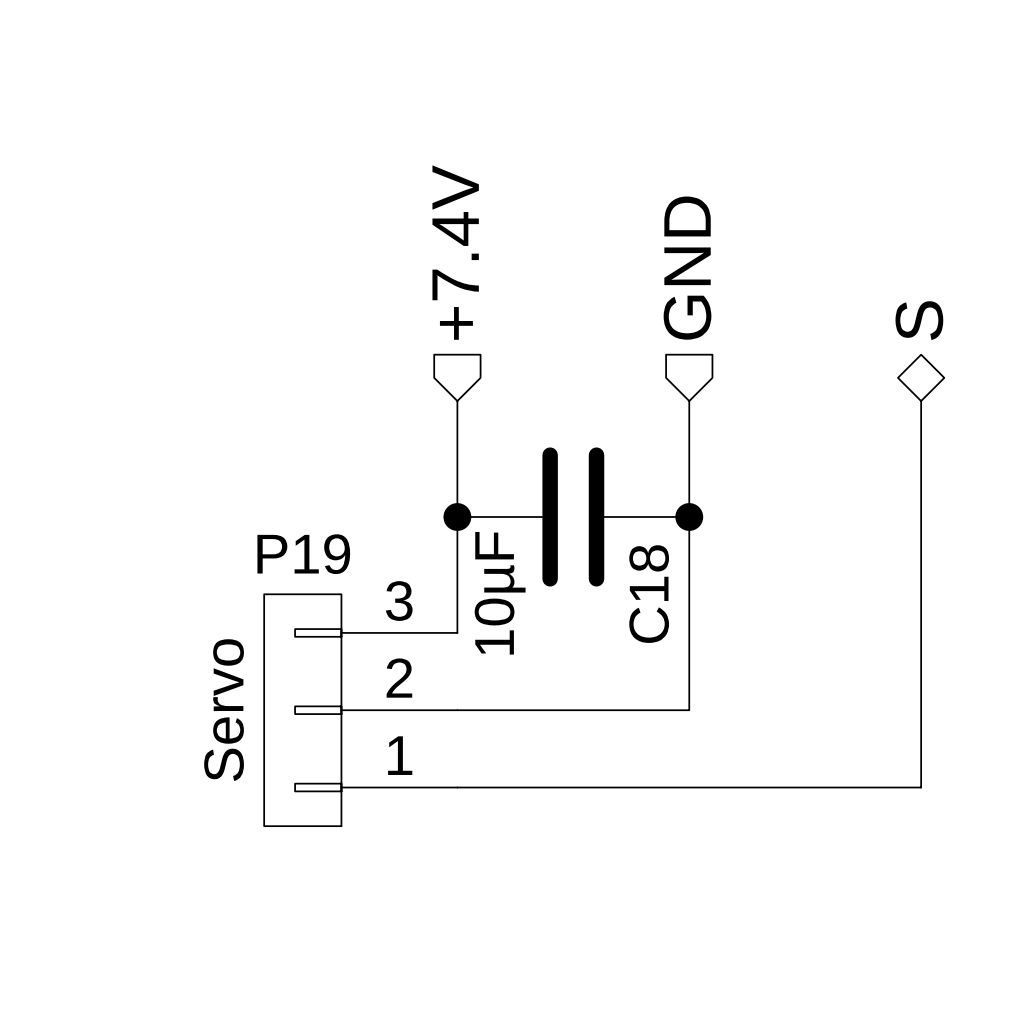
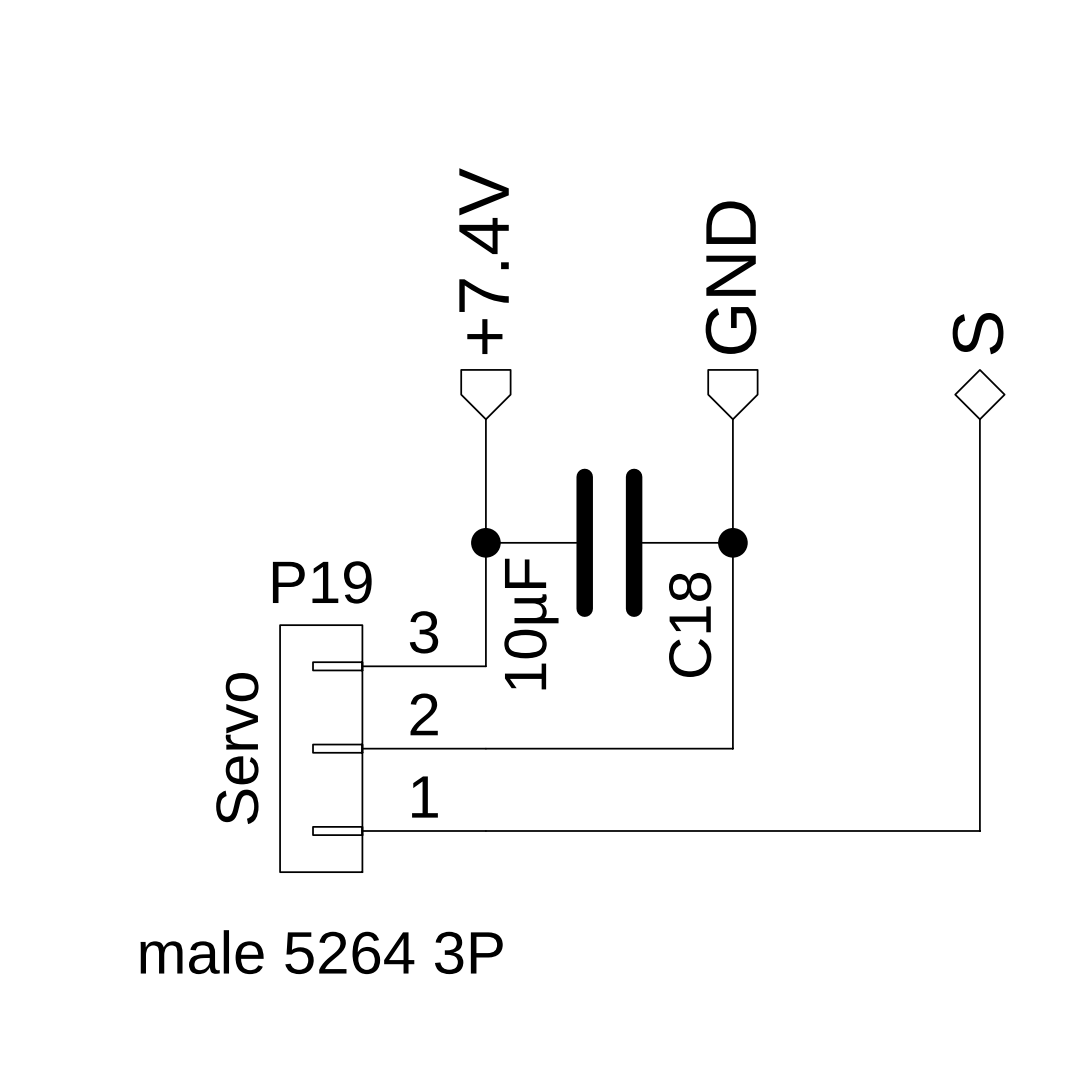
P19 text: none -> male 5264 3P (321, 952)

